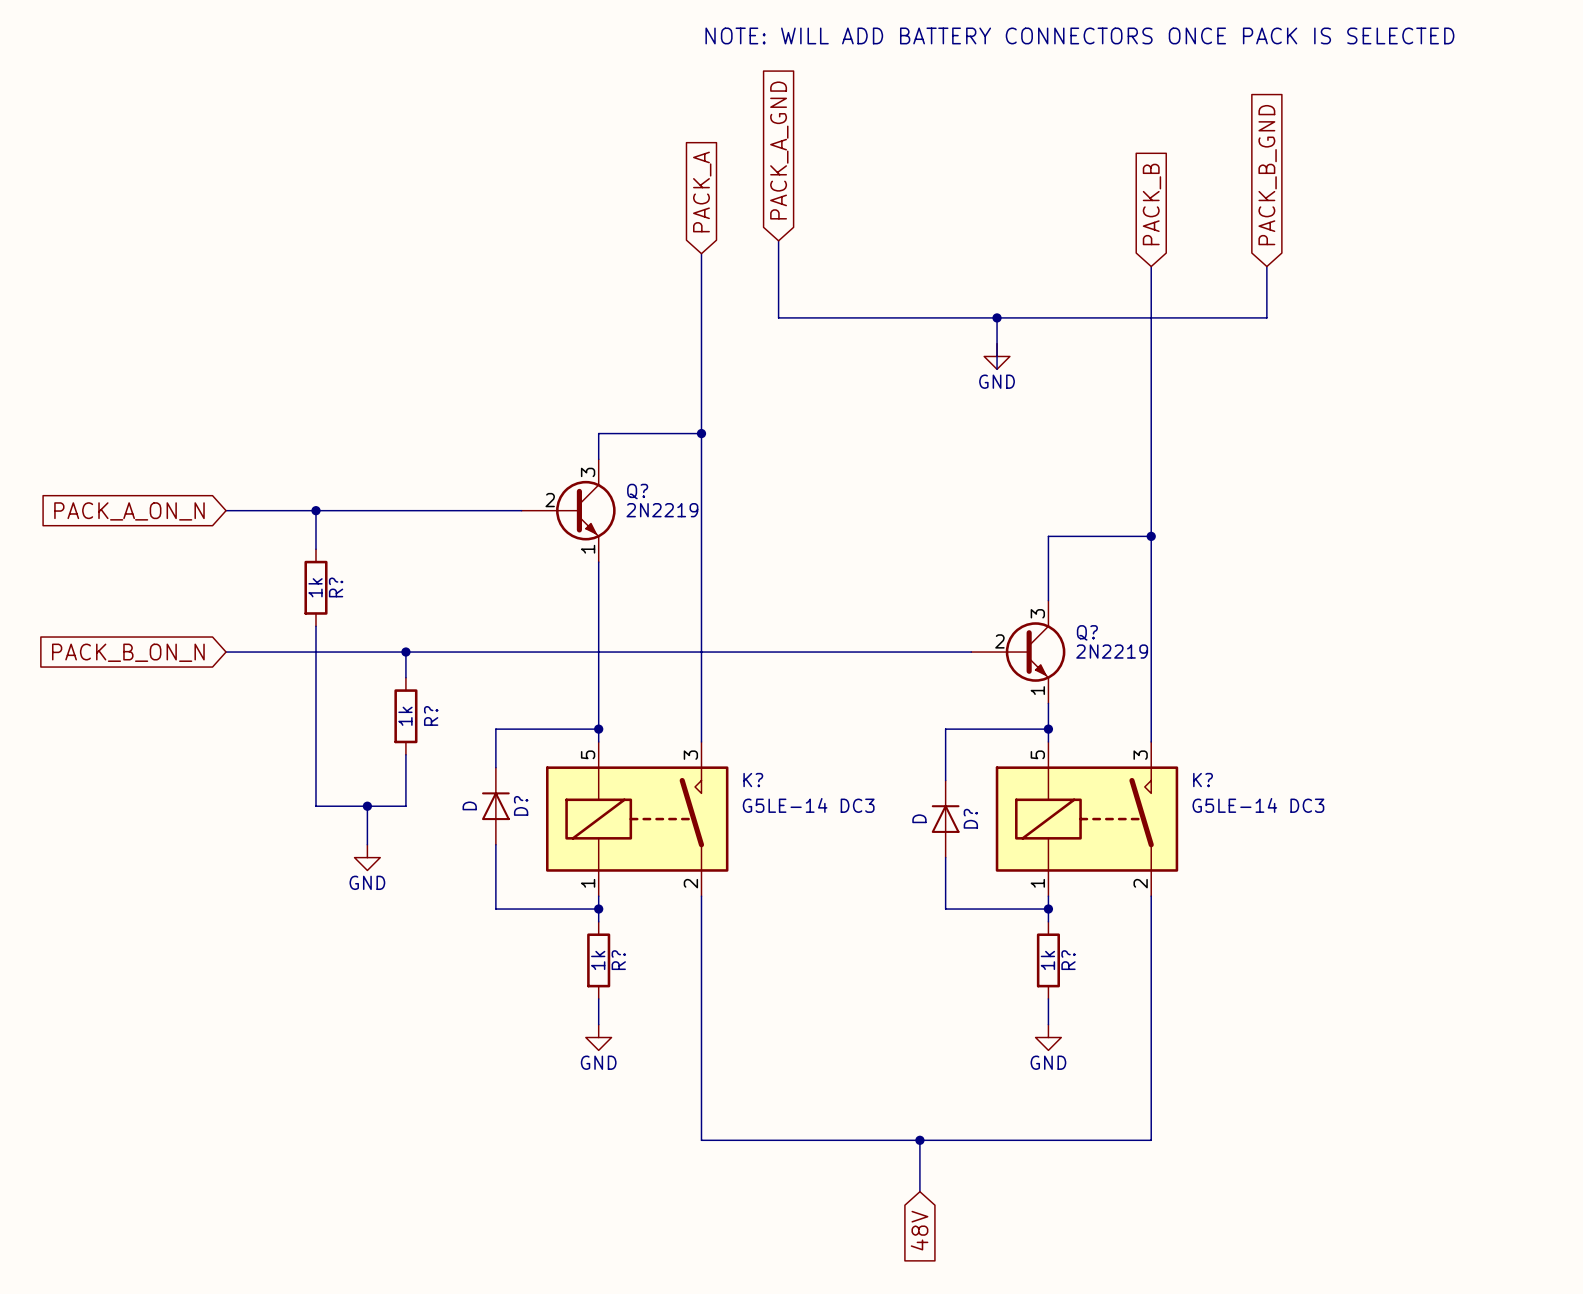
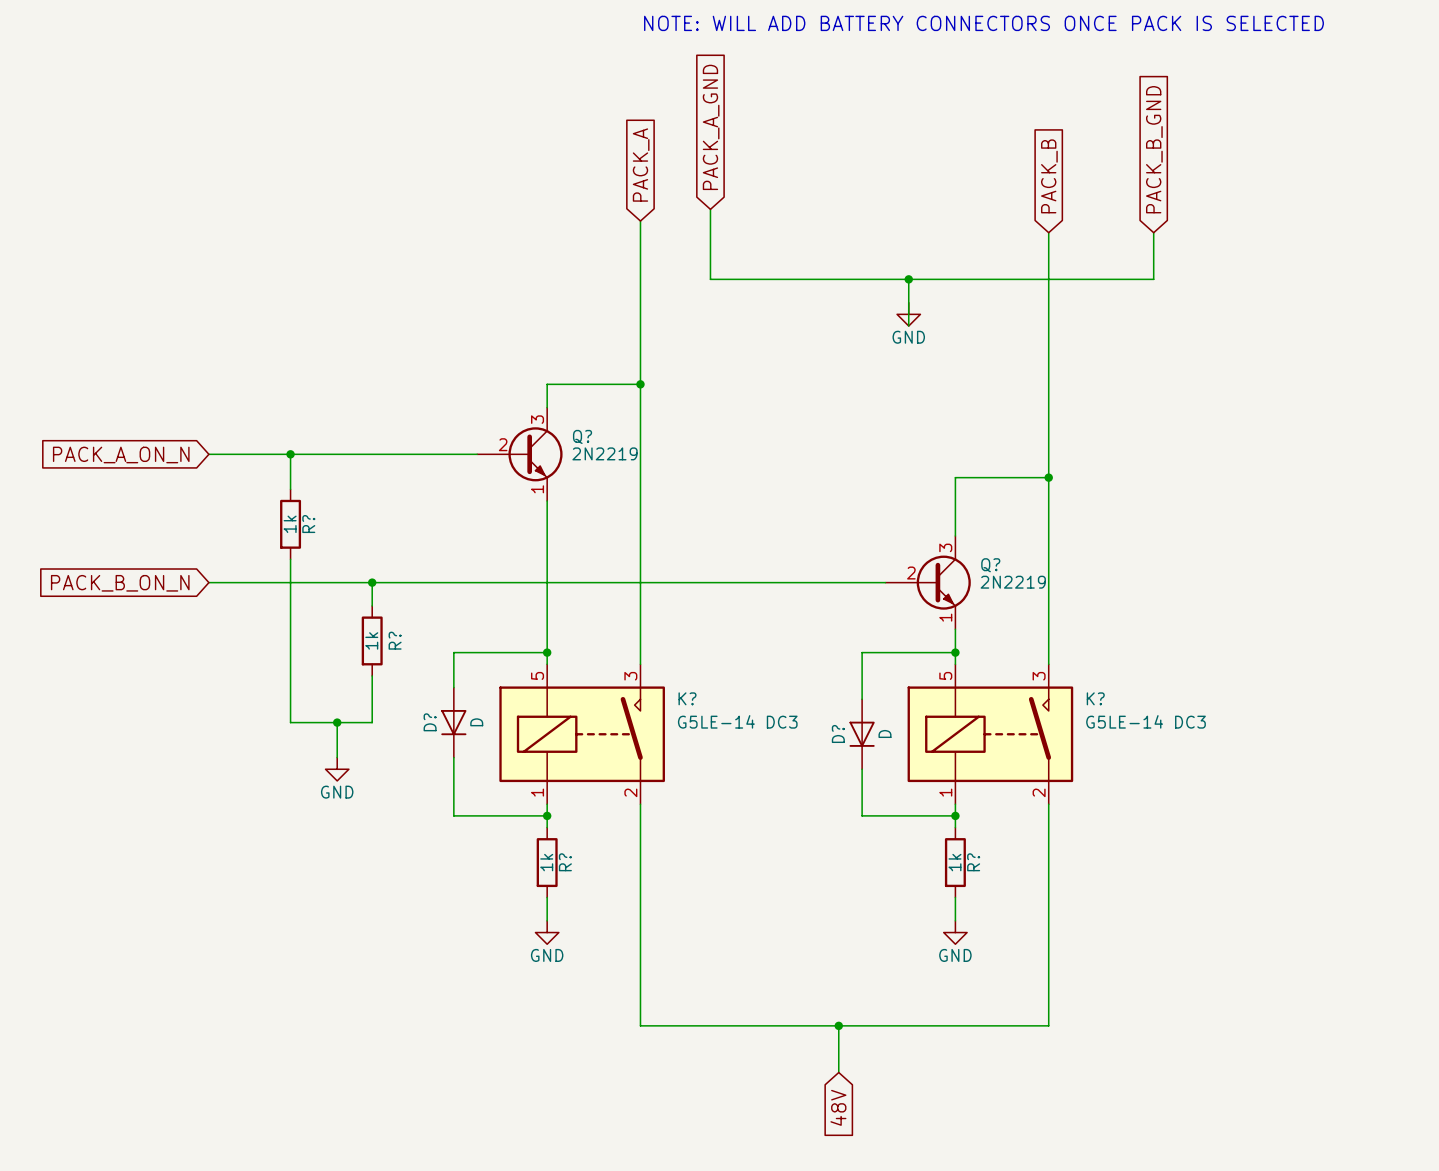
D? rotation: 0° (495, 806) -> 180° (453, 722)
D? rotation: 0° (945, 819) -> 180° (862, 734)

